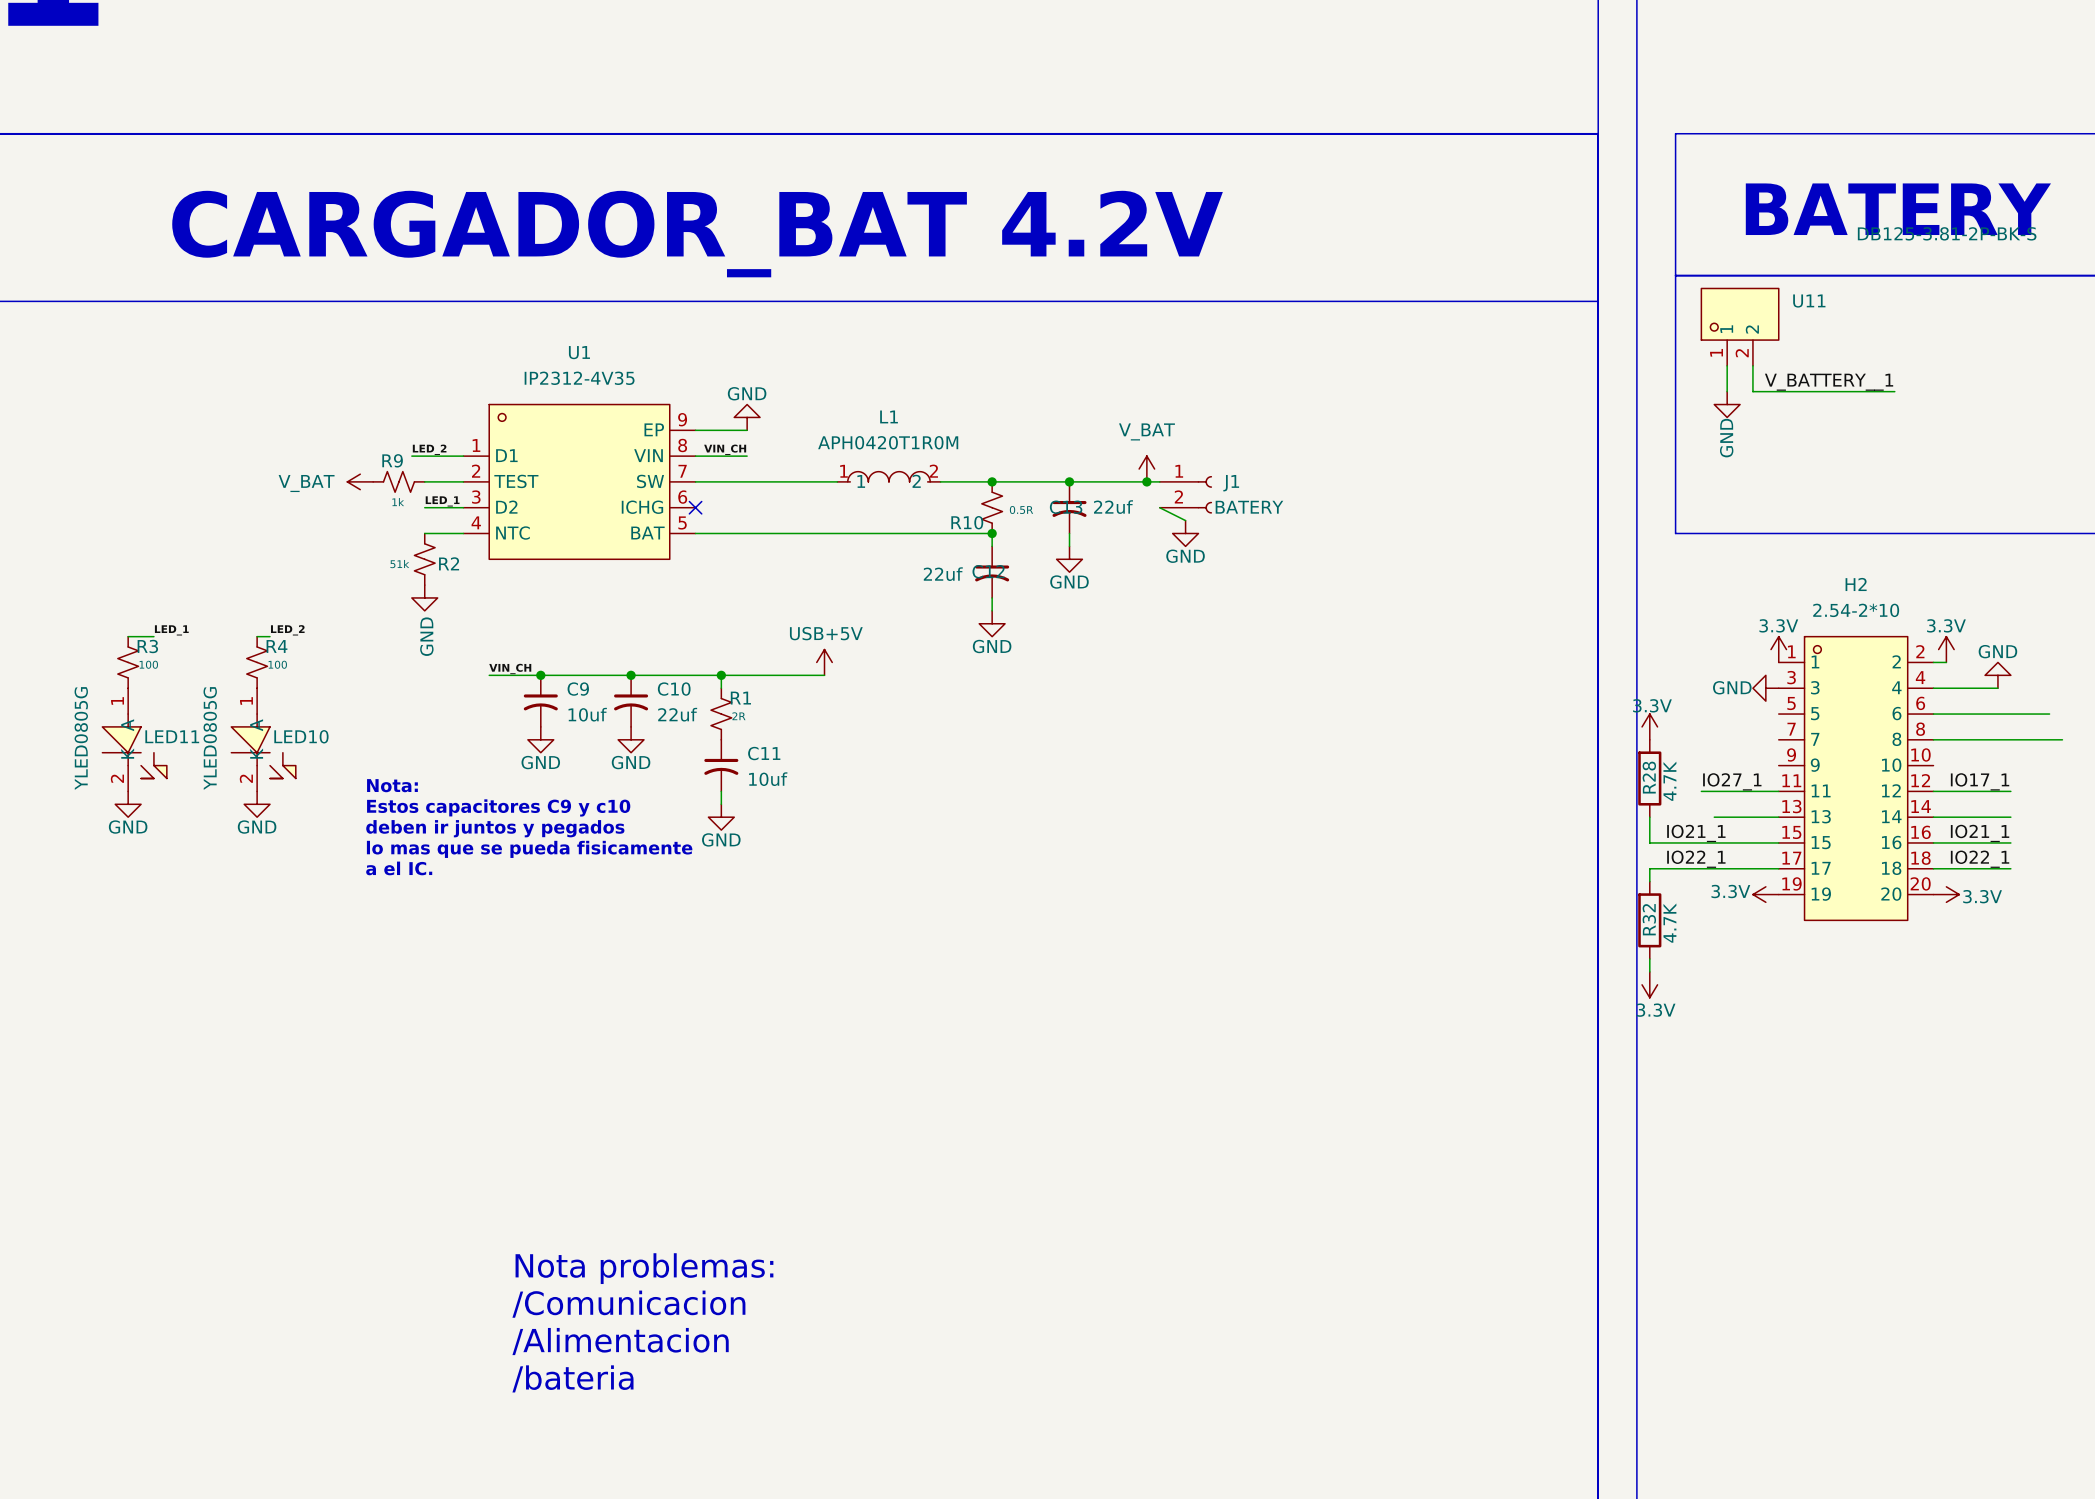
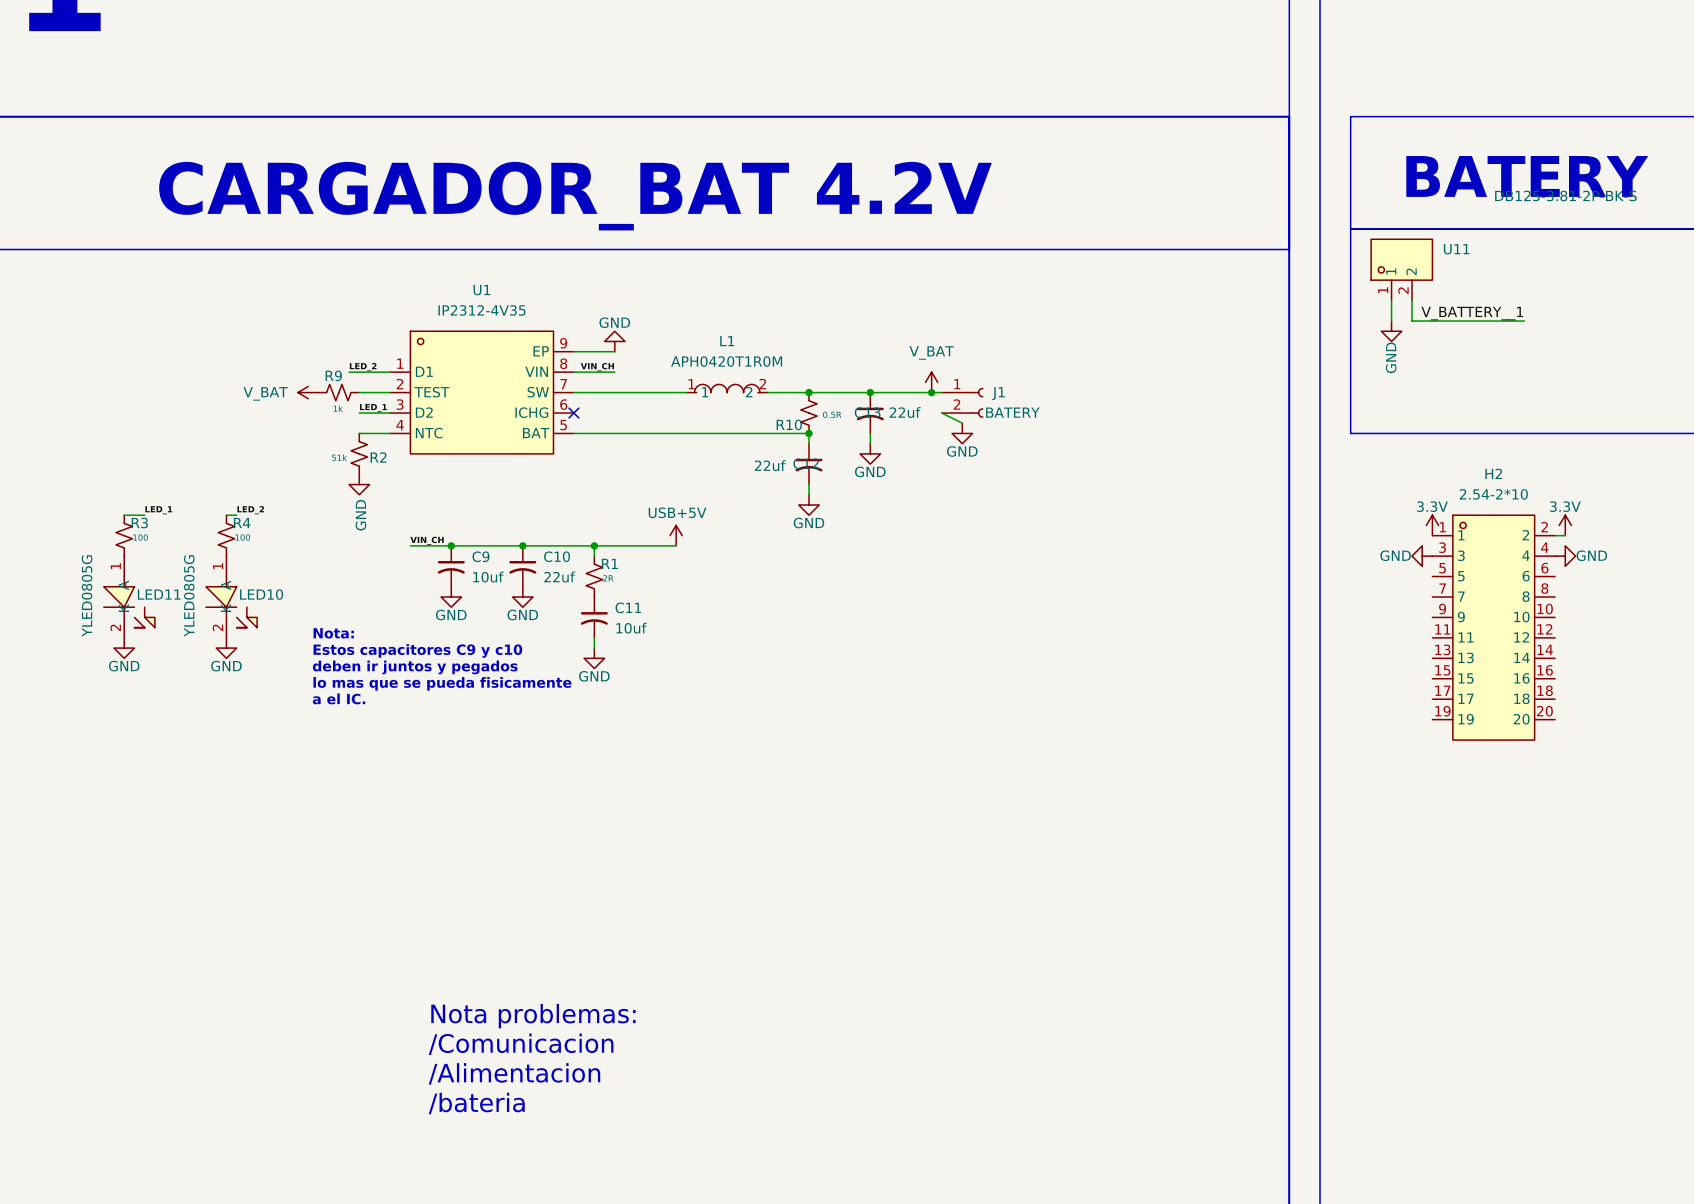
power symbol rotation: 0° (1997, 675) -> 90° clockwise (1565, 556)
power symbol position: GND (1997, 675) -> GND (1565, 556)
wire: (1933, 688) (1997, 688) -> none
wire: (1933, 714) (2049, 714) -> none
power symbol: 3.3V (1649, 726) -> none
wire: (1933, 739) (2062, 739) -> none
R28: 4.7K (1649, 778) -> none
label: IO27_1 (1732, 781) -> none
label: IO17_1 (1980, 781) -> none
wire: (1701, 791) (1778, 791) -> none
wire: (1933, 791) (2010, 791) -> none
wire: (1649, 817) (1649, 842) (1778, 842) -> none
wire: (1714, 817) (1778, 817) -> none
wire: (1933, 817) (2010, 817) -> none
label: IO21_1 (1696, 833) -> none
label: IO21_1 (1980, 833) -> none
wire: (1933, 842) (2010, 842) -> none
label: IO22_1 (1696, 859) -> none
label: IO22_1 (1980, 859) -> none
wire: (1778, 868) (1649, 868) (1649, 881) -> none
wire: (1933, 868) (2010, 868) -> none
power symbol: 3.3V (1765, 894) -> none
power symbol: 3.3V (1946, 894) -> none
R32: 4.7K (1649, 920) -> none
wire: (1649, 959) (1649, 971) -> none
power symbol: 3.3V (1649, 984) -> none

